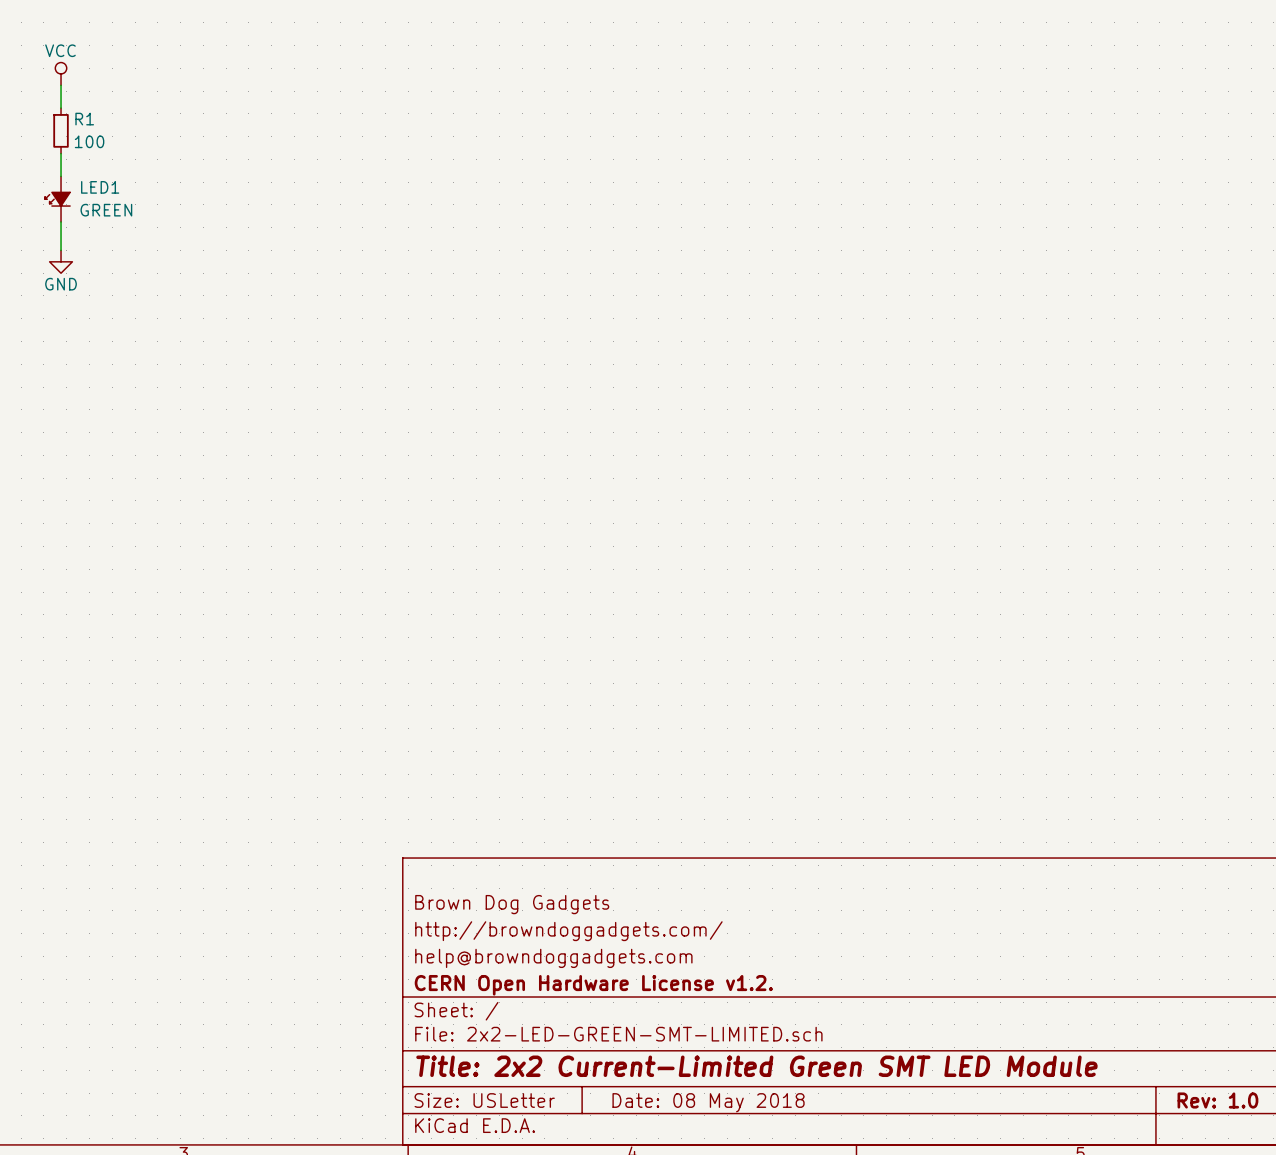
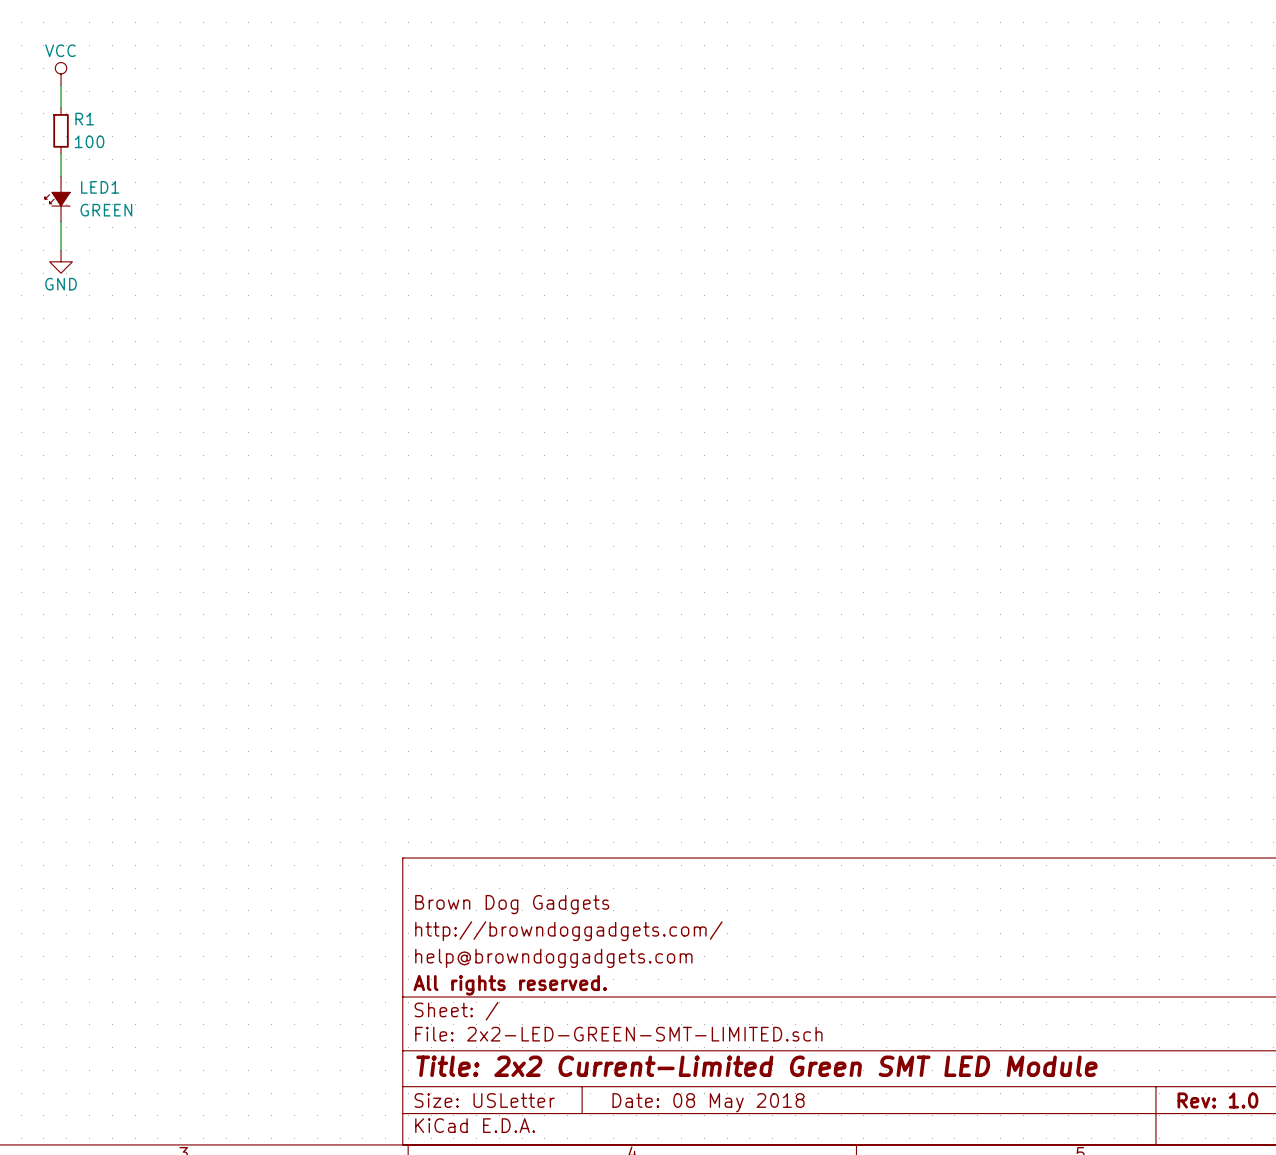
title block: CERN Open Hardware License v1.2. (593, 985) -> All rights reserved. (510, 985)

